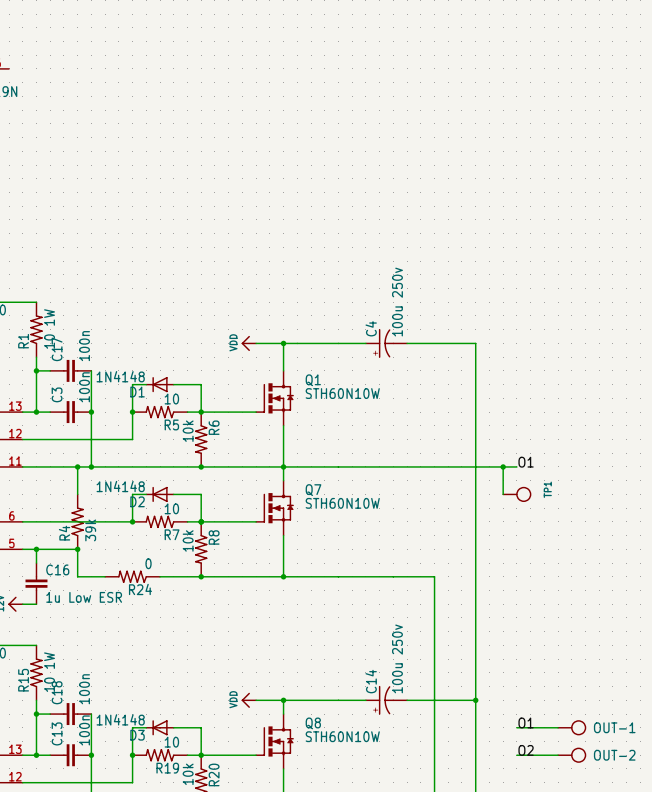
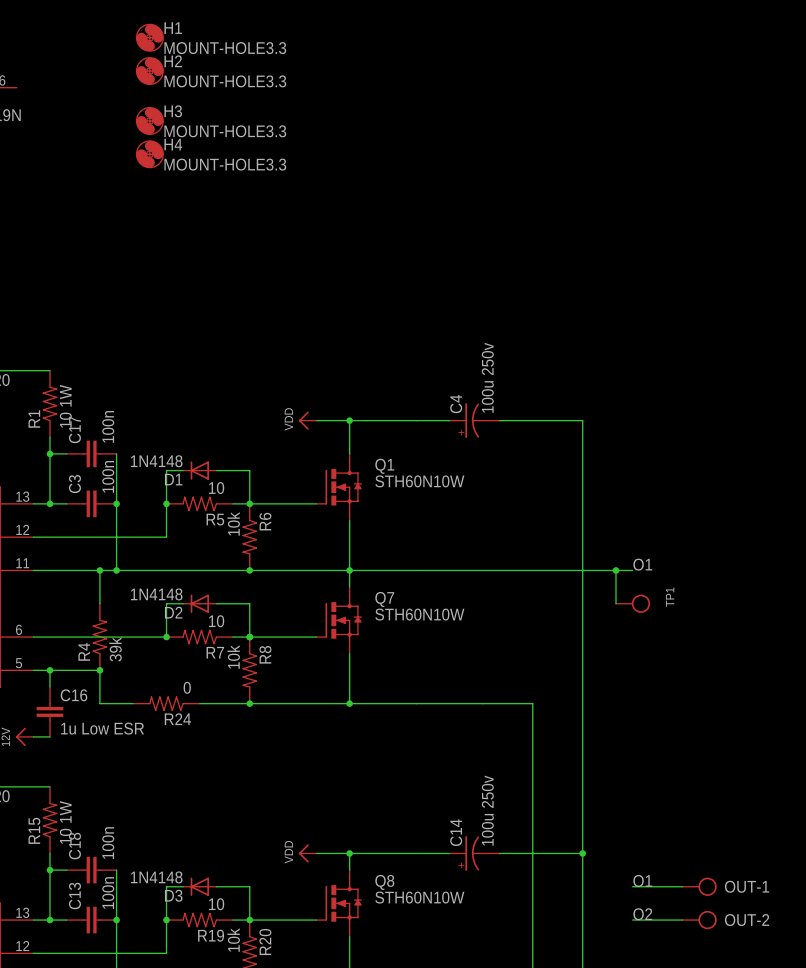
H1: none -> MOUNT-HOLE3.3 (149, 37)
H2: none -> MOUNT-HOLE3.3 (149, 71)
H3: none -> MOUNT-HOLE3.3 (149, 120)
H4: none -> MOUNT-HOLE3.3 (149, 154)

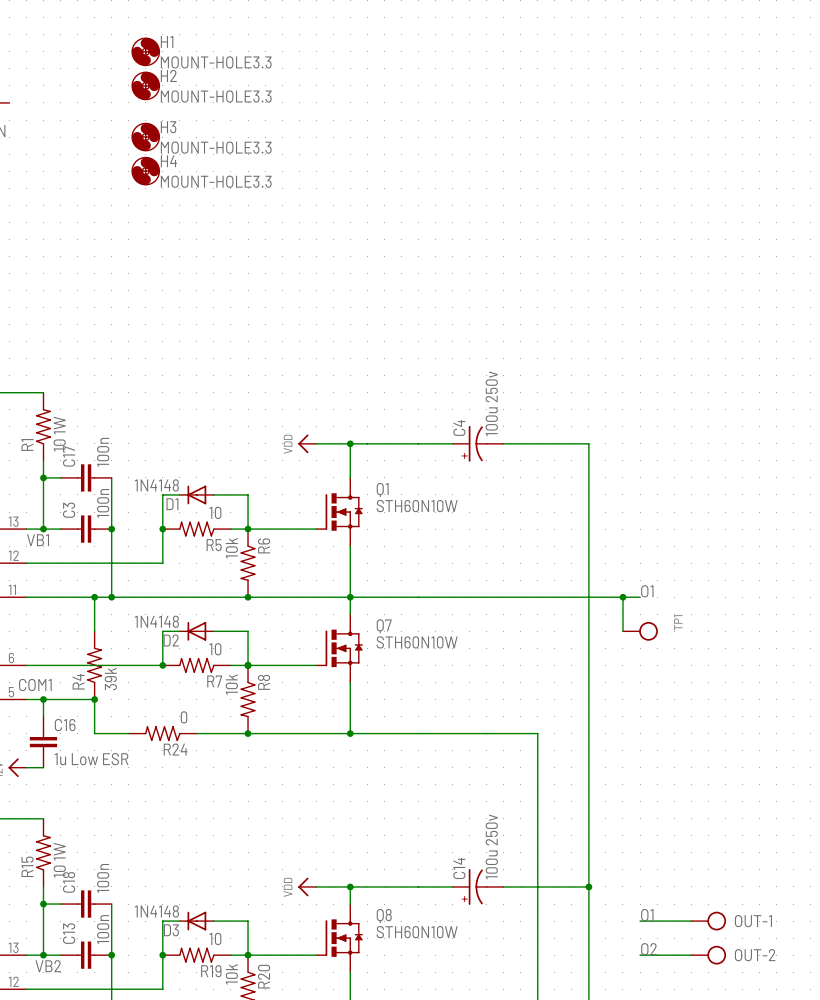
label: none -> VB1 (38, 540)
label: none -> COM1 (35, 685)
label: none -> VB2 (48, 966)

